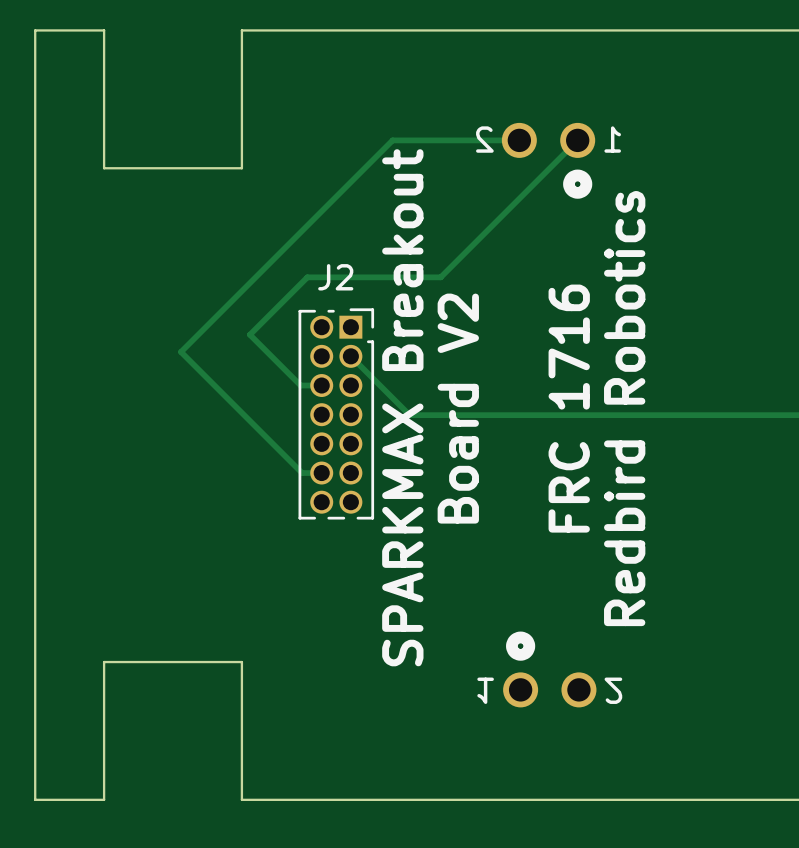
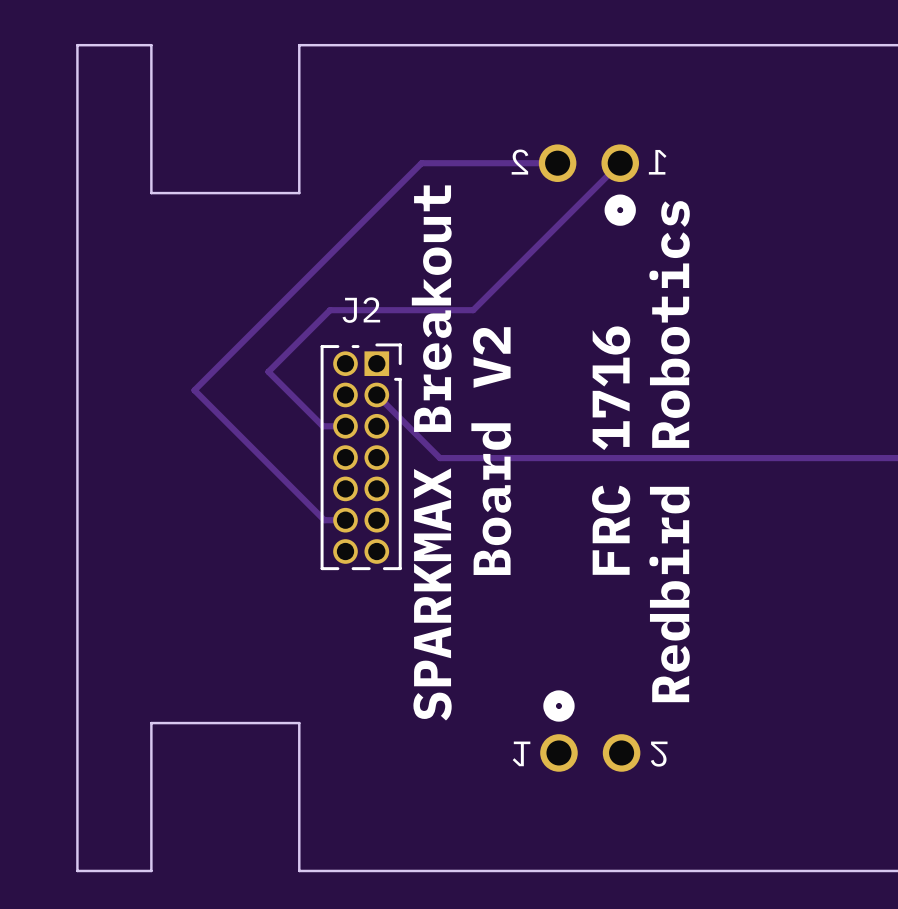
board edge: (71, 30) (35, 30) (35, 799) (71, 799) -> (77, 45) (77, 870)
board edge: (104, 30) (104, 168) (140, 168) -> (111, 45) (151, 45) (151, 193)
board edge: (278, 30) (241, 30) (241, 168) -> (299, 45) (299, 193) (259, 193)
board edge: (140, 662) (104, 662) (104, 799) -> (151, 723) (151, 870) (111, 870)
board edge: (241, 662) (241, 799) (278, 799) -> (259, 723) (299, 723) (299, 870)

